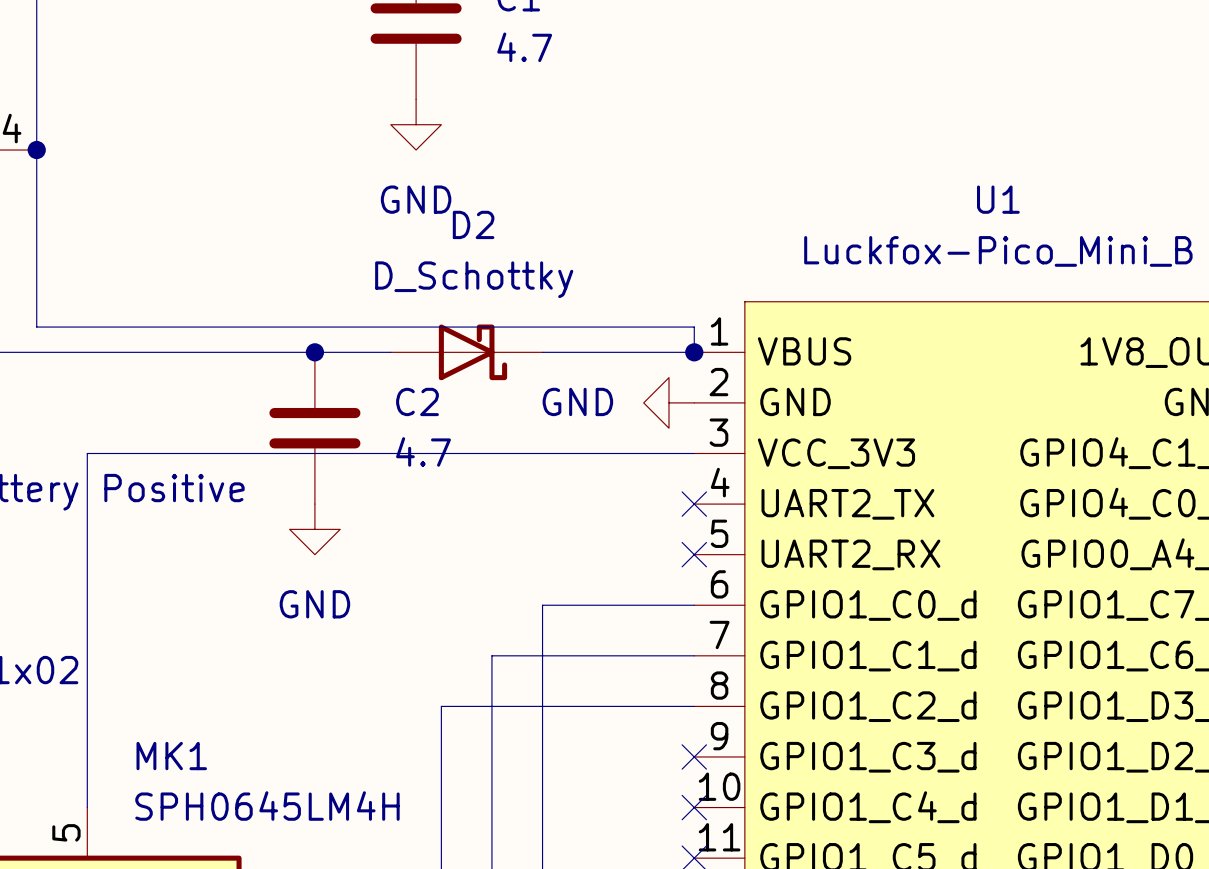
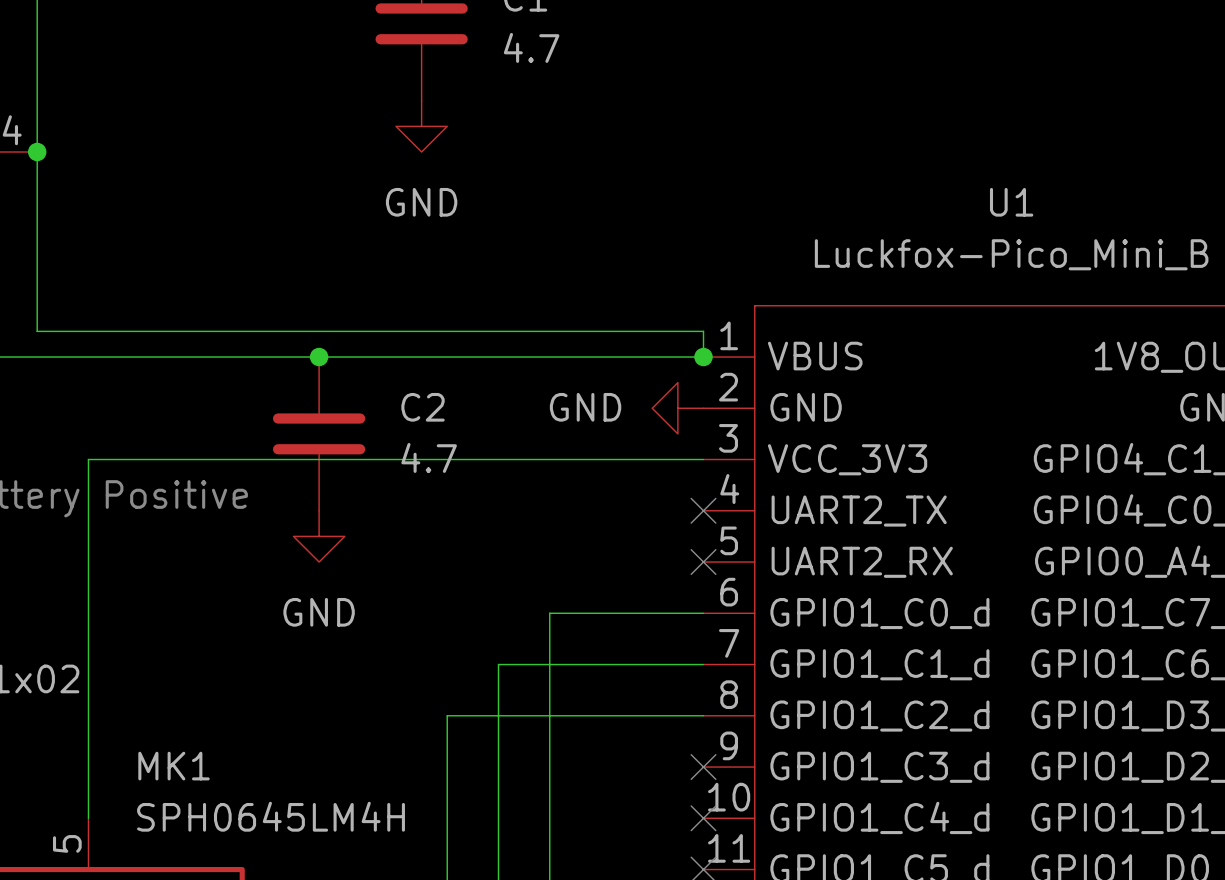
D2: D_Schottky (466, 352) -> none

